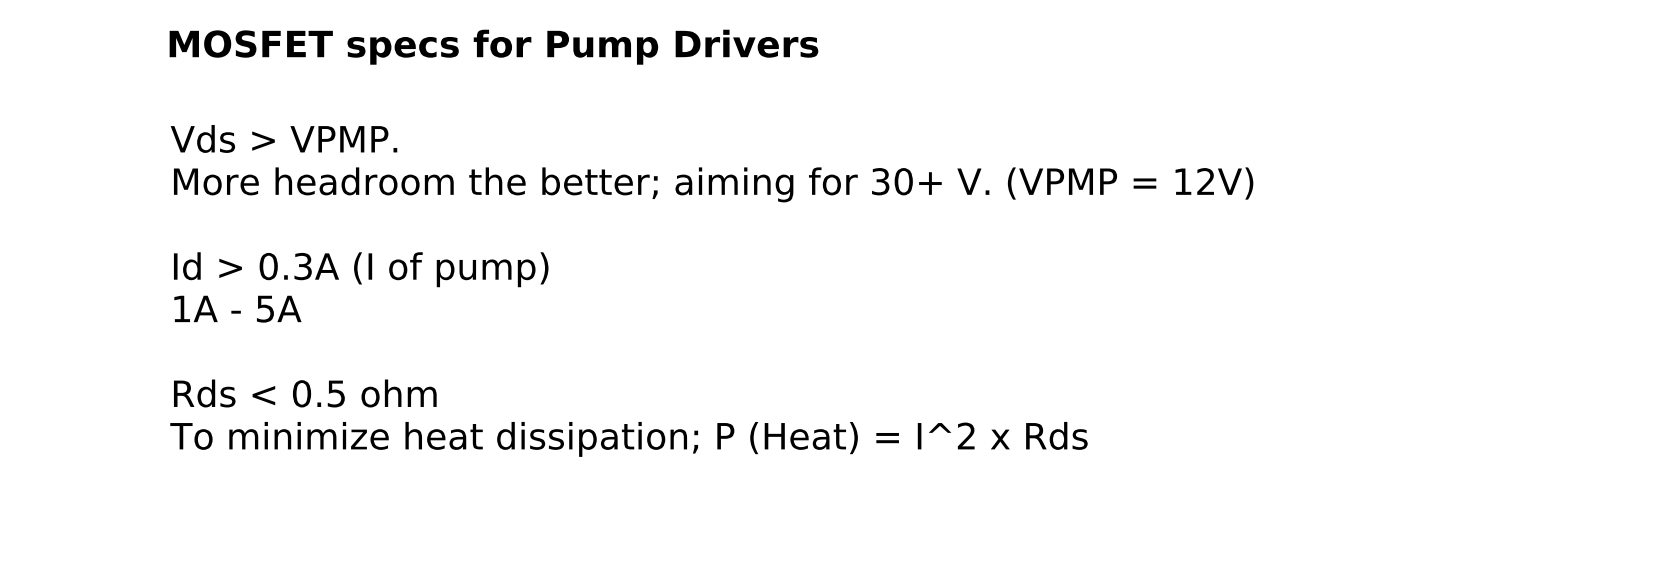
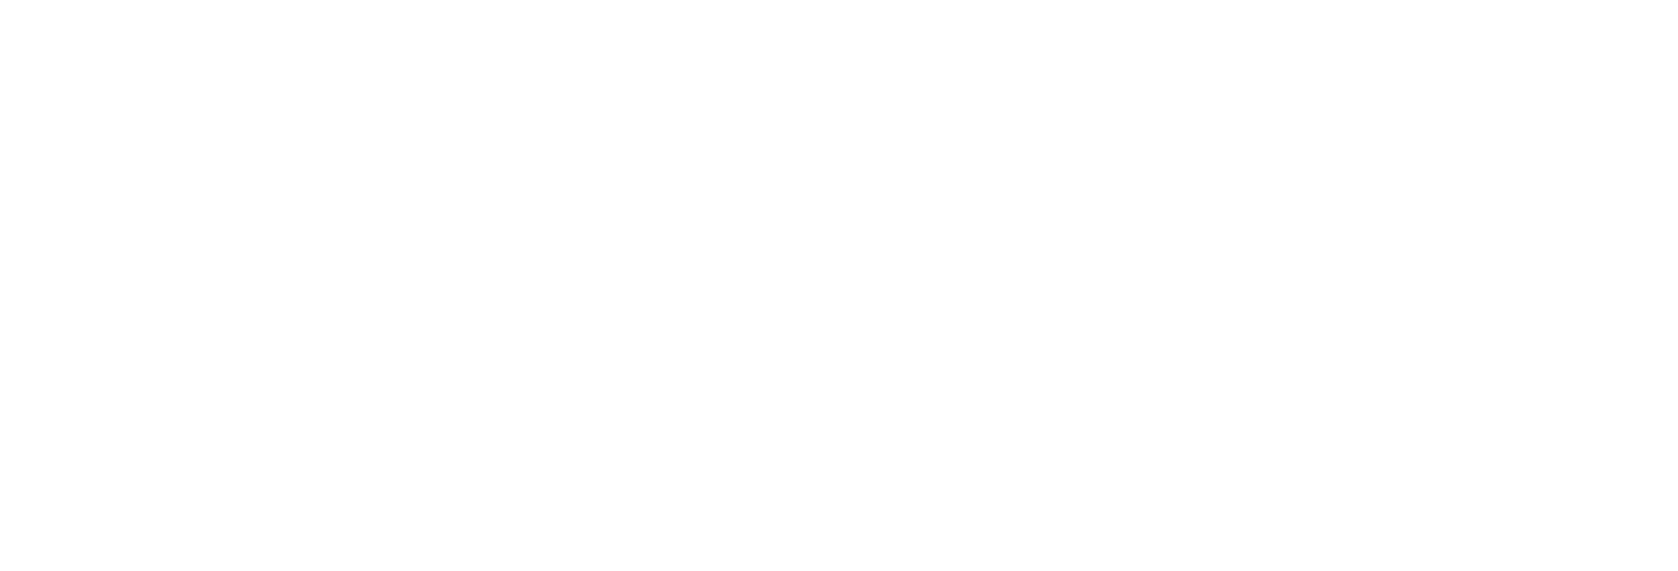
text: MOSFET specs for Pump Drivers (493, 47) -> none
text: Vds > VPMP. (283, 138) -> none
text: More headroom the better; aiming for 30+ V. (VPMP = 12V) (713, 184) -> none
text: Id > 0.3A (I of pump) (361, 269) -> none
text: 1A - 5A (237, 309) -> none
text: Rds < 0.5 ohm (305, 393) -> none
text: To minimize heat dissipation; P (Heat) = I^2 x Rds (628, 439) -> none

